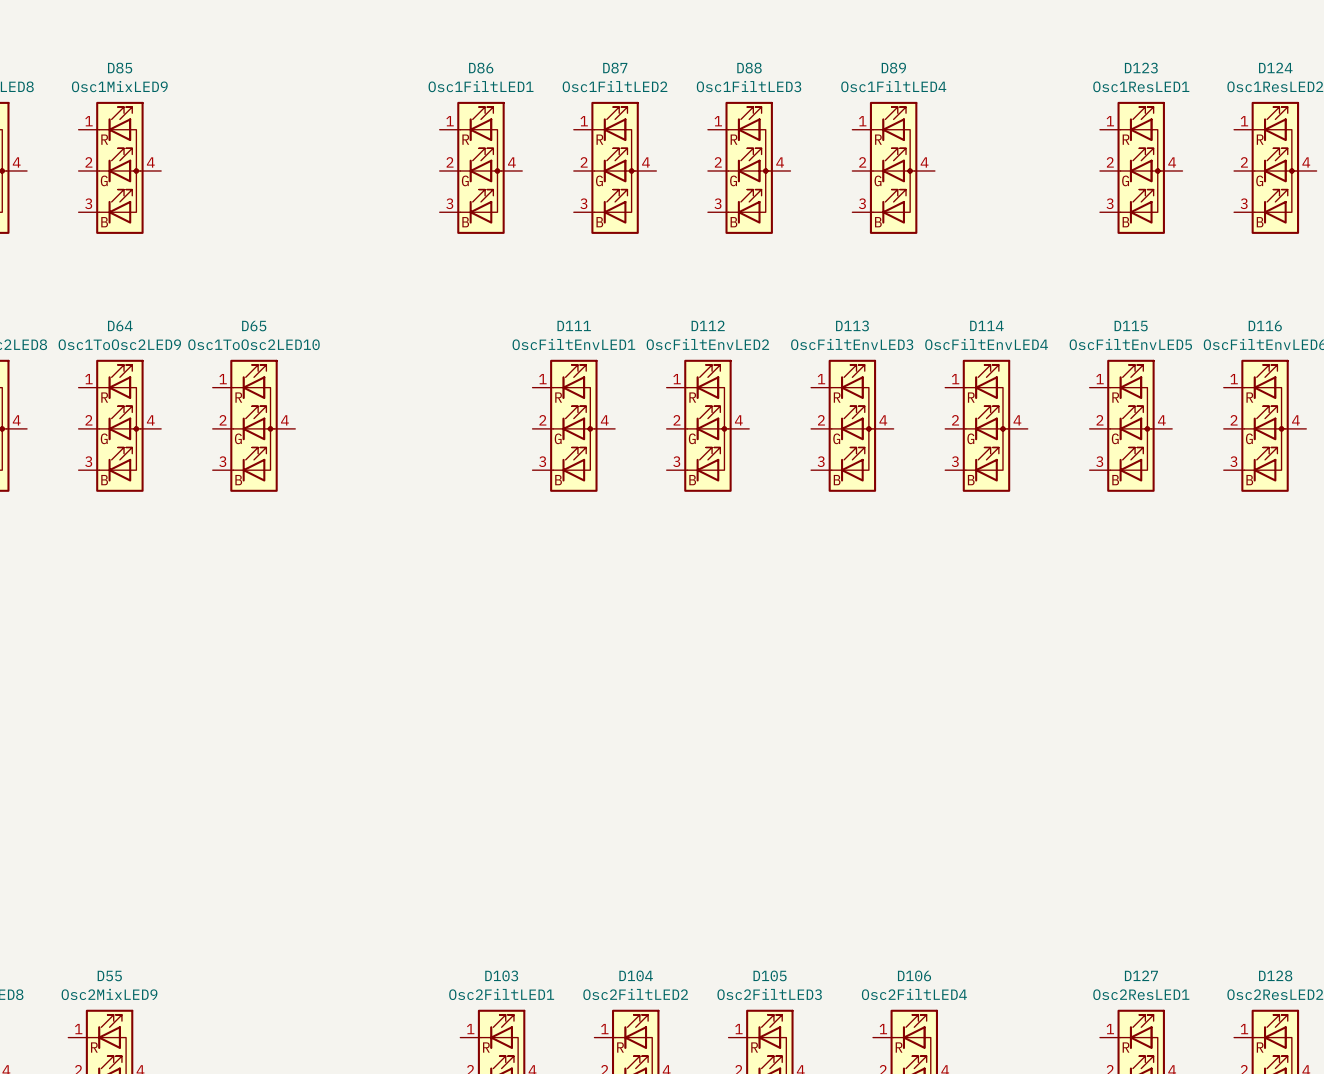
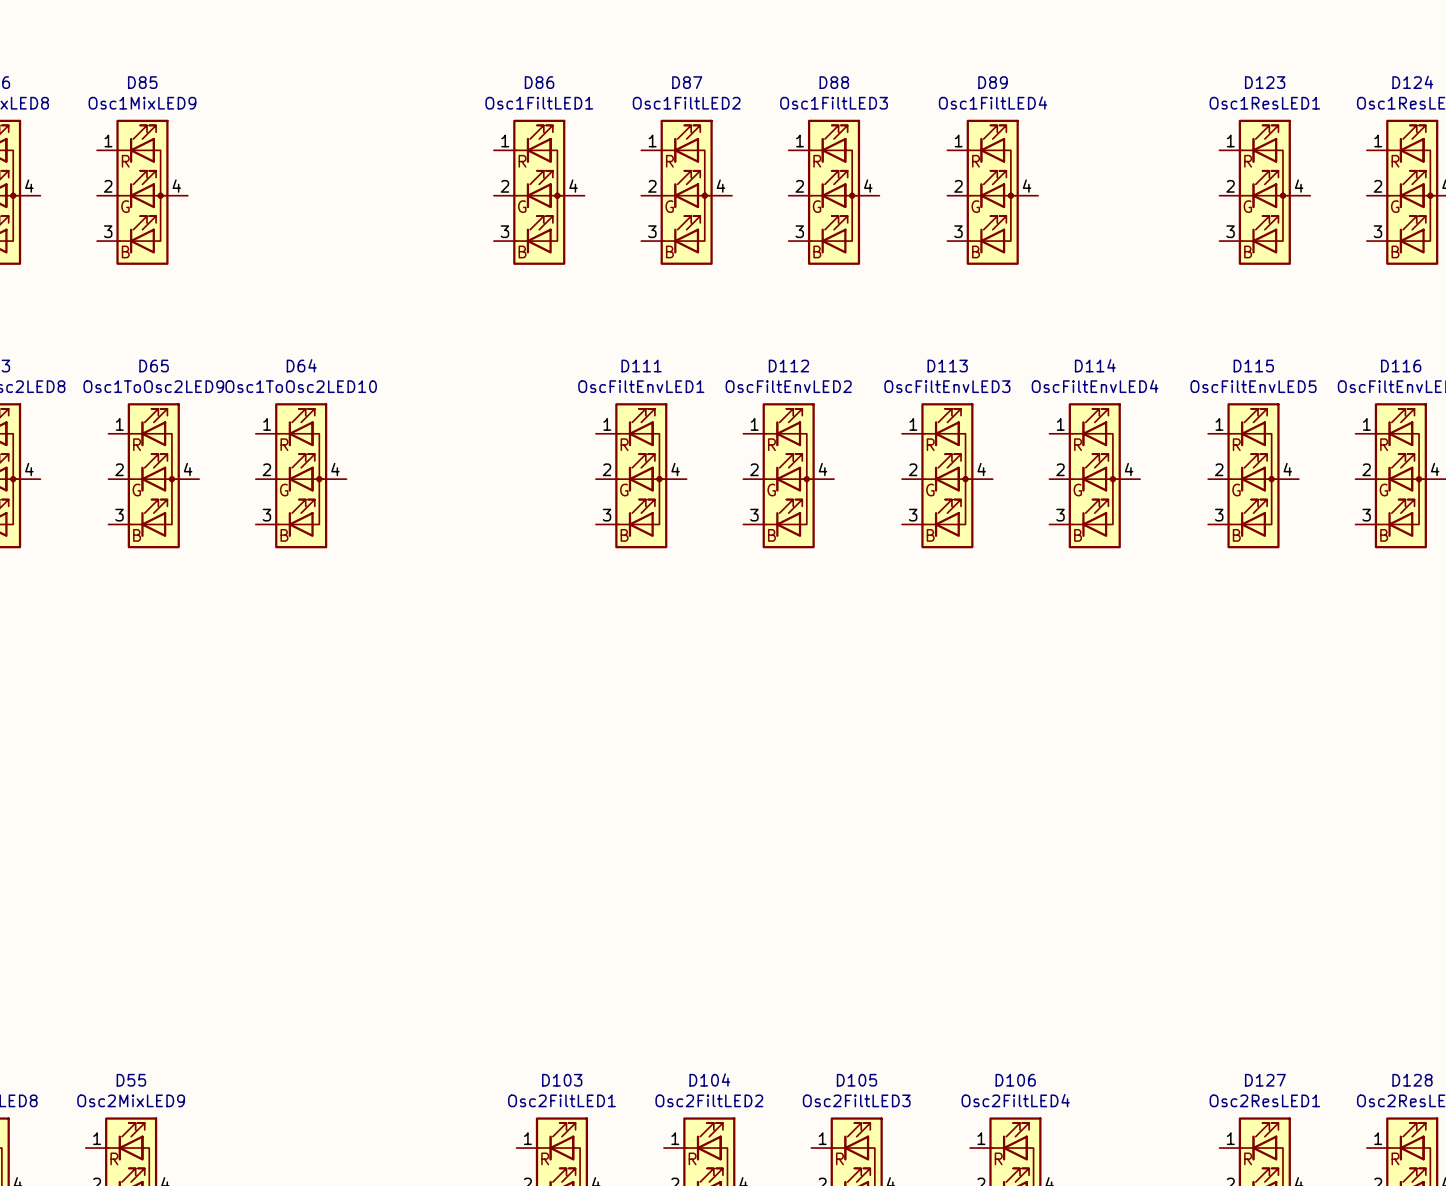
D64 value: Osc1ToOsc2LED9 (119, 344) -> Osc1ToOsc2LED10 (301, 386)
D65 value: Osc1ToOsc2LED10 (254, 344) -> Osc1ToOsc2LED9 (153, 386)
D64 position: (119, 425) -> (301, 475)
D65 position: (254, 425) -> (153, 475)

